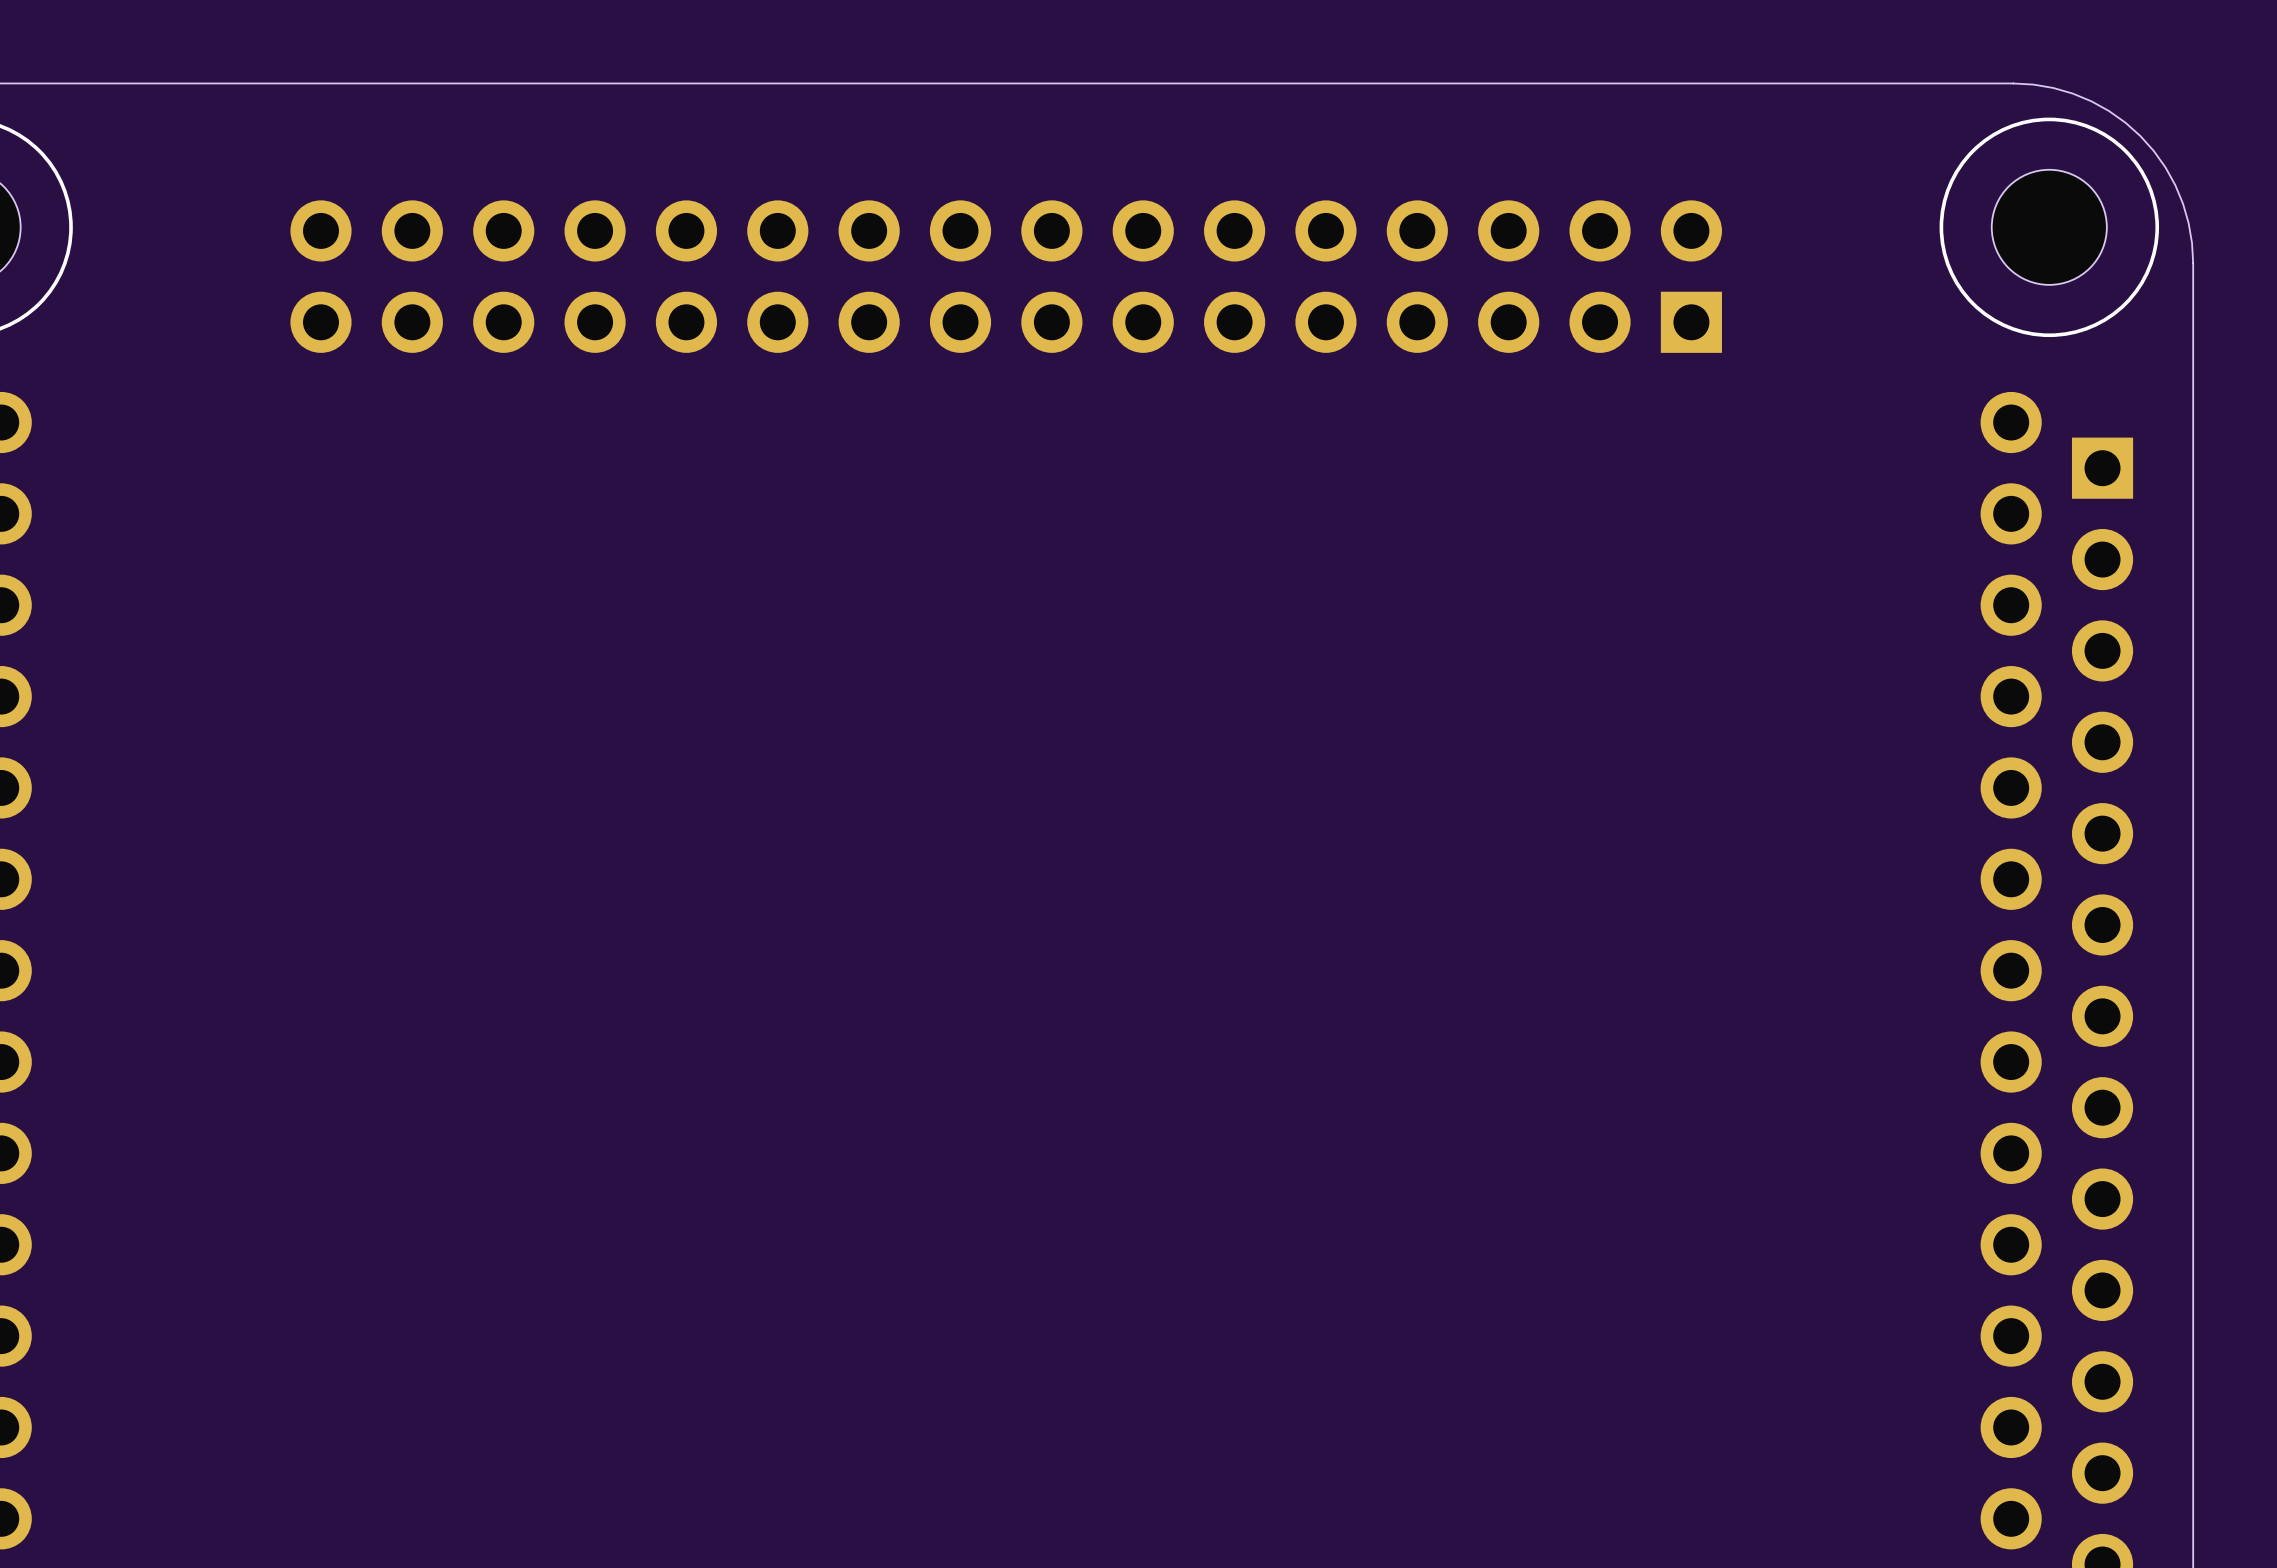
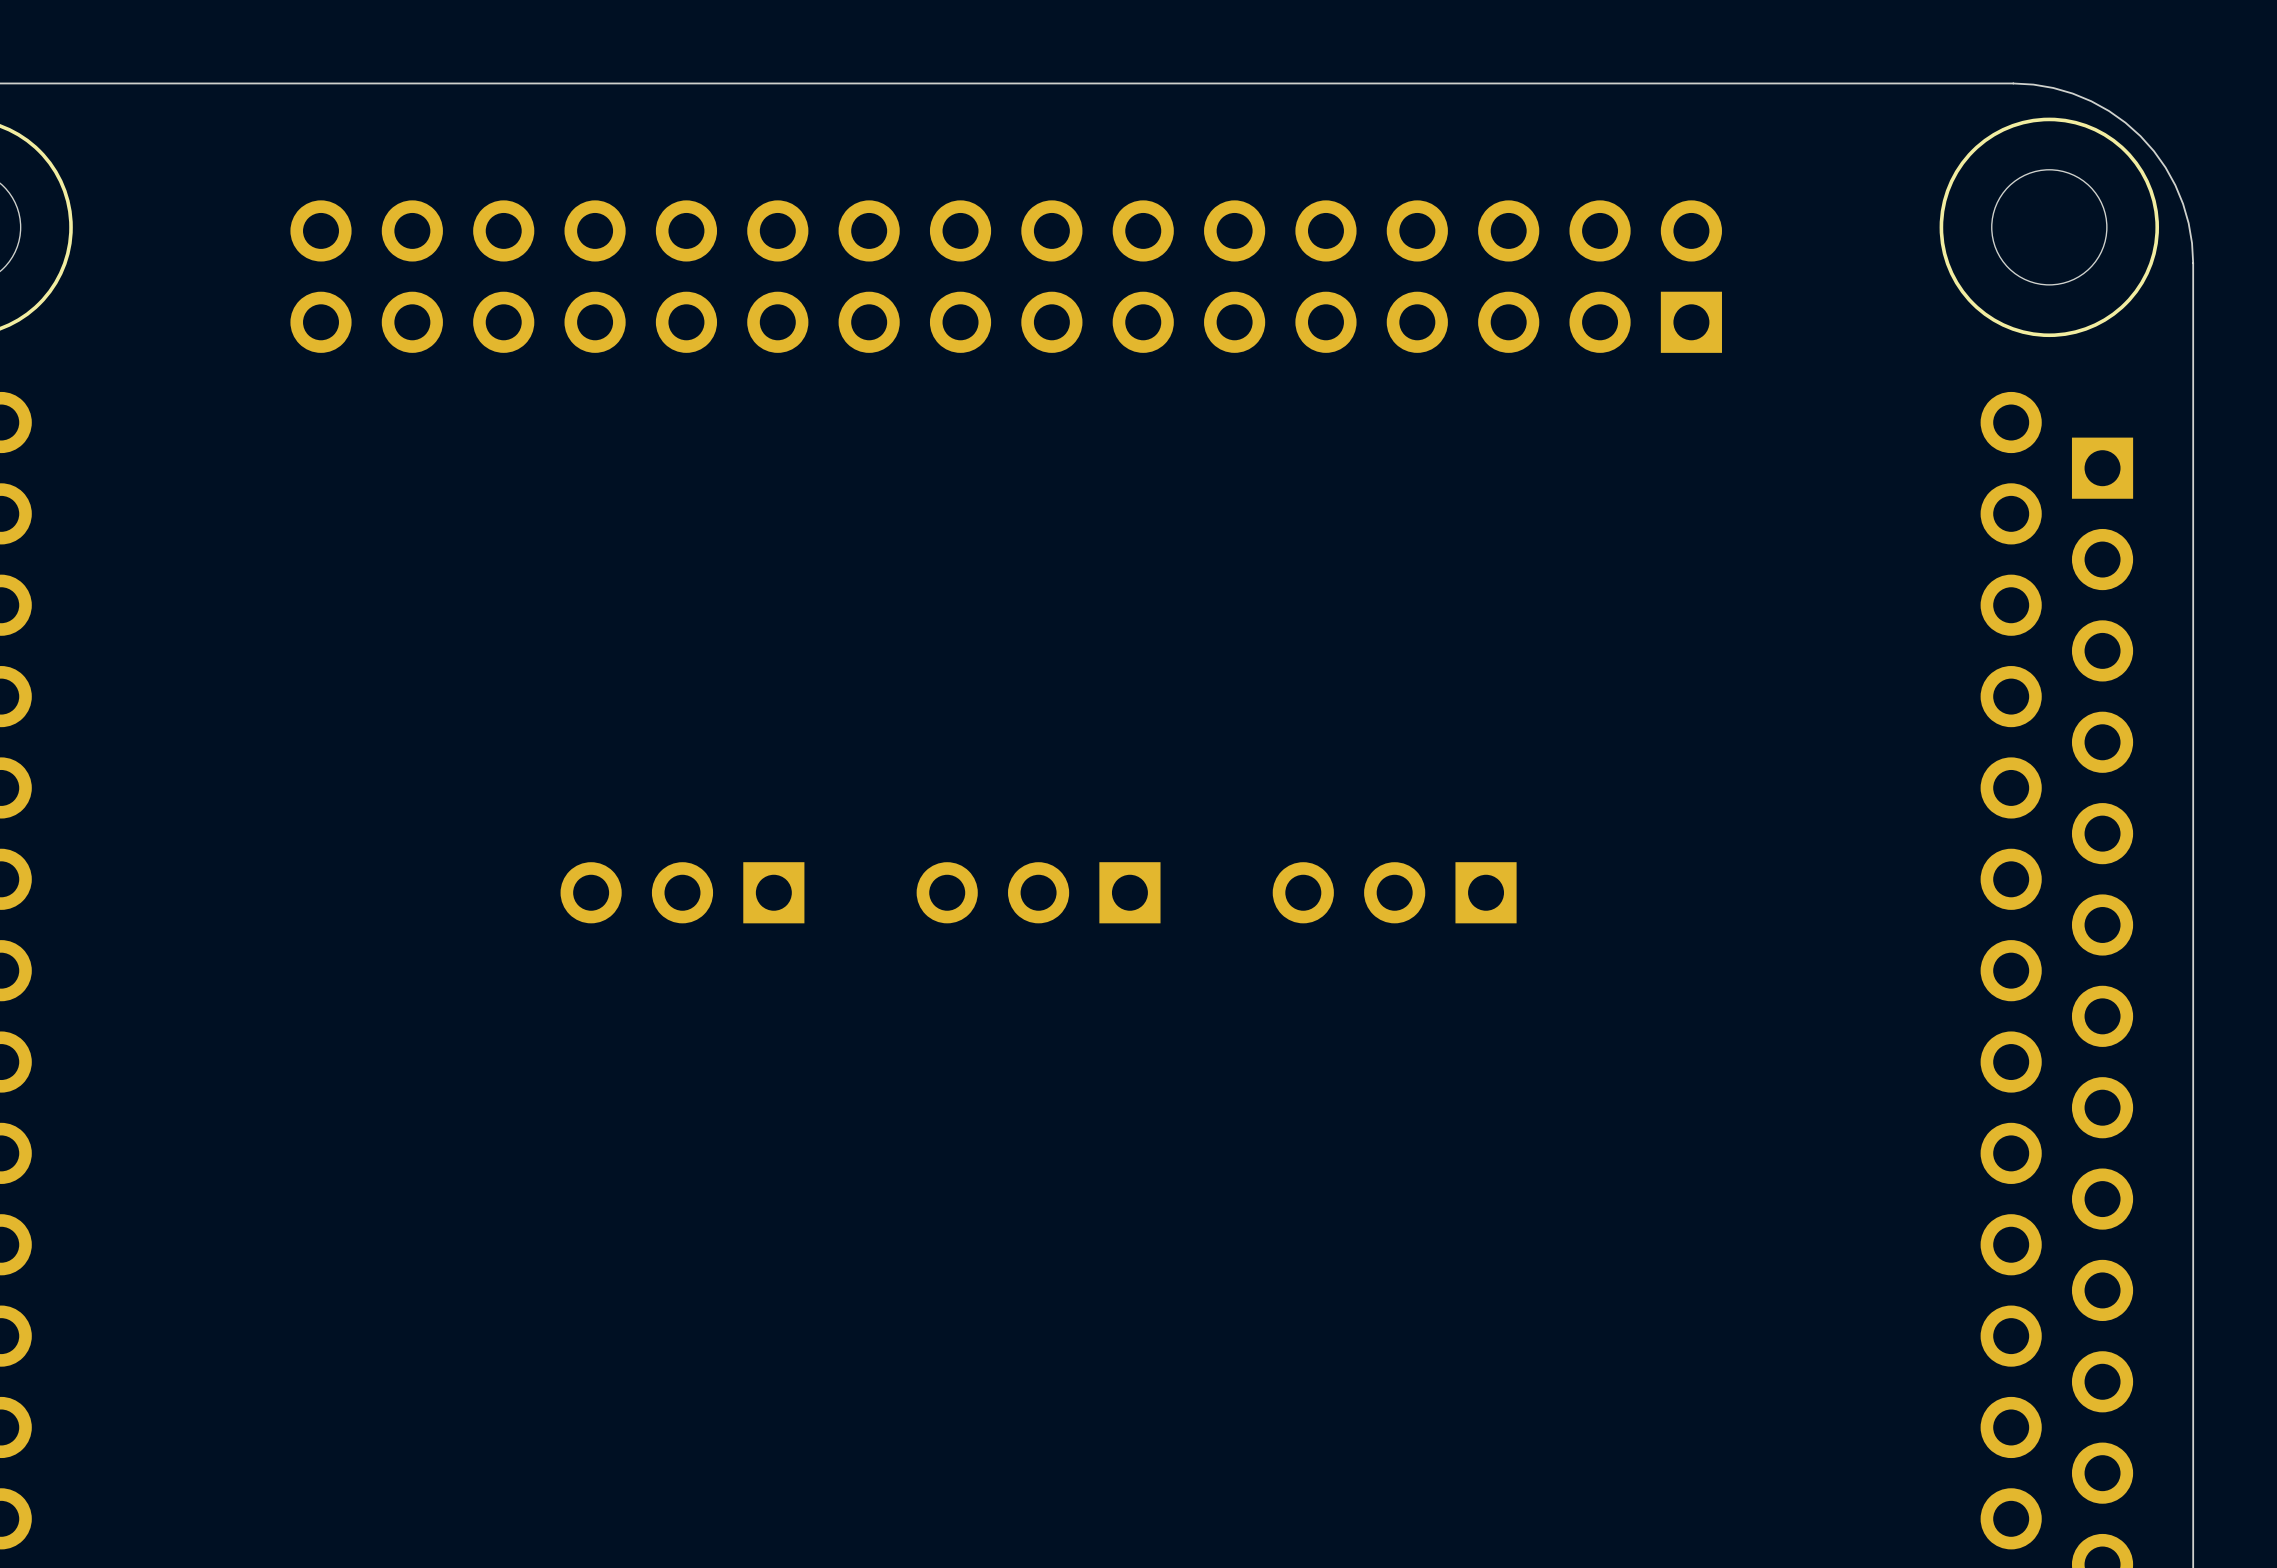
part: none -> (682, 892)
part: none -> (1038, 892)
part: none -> (1394, 892)

